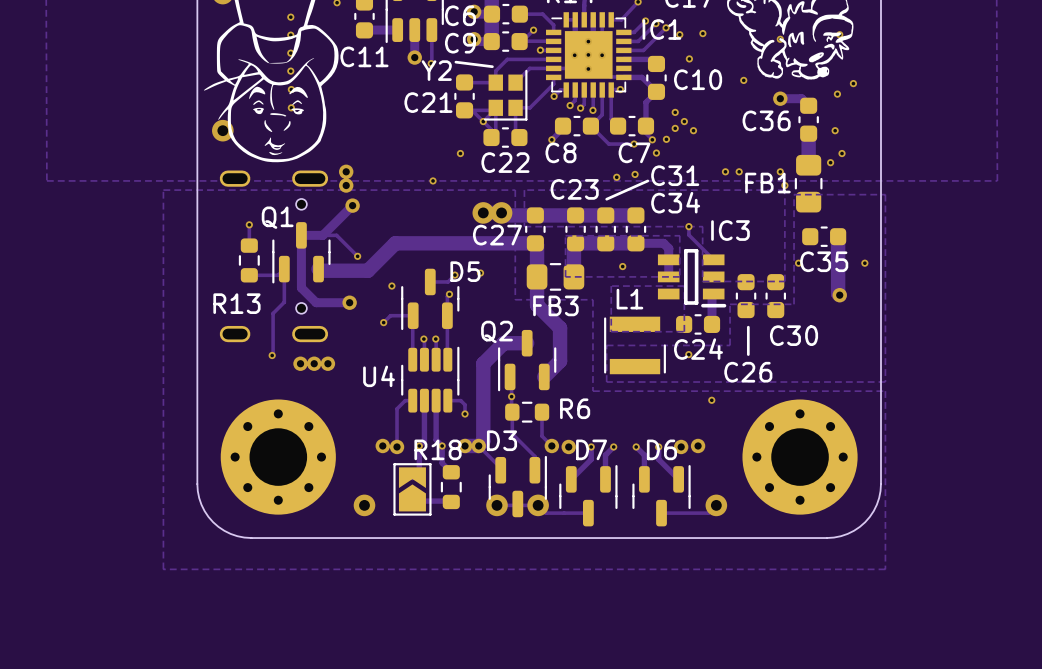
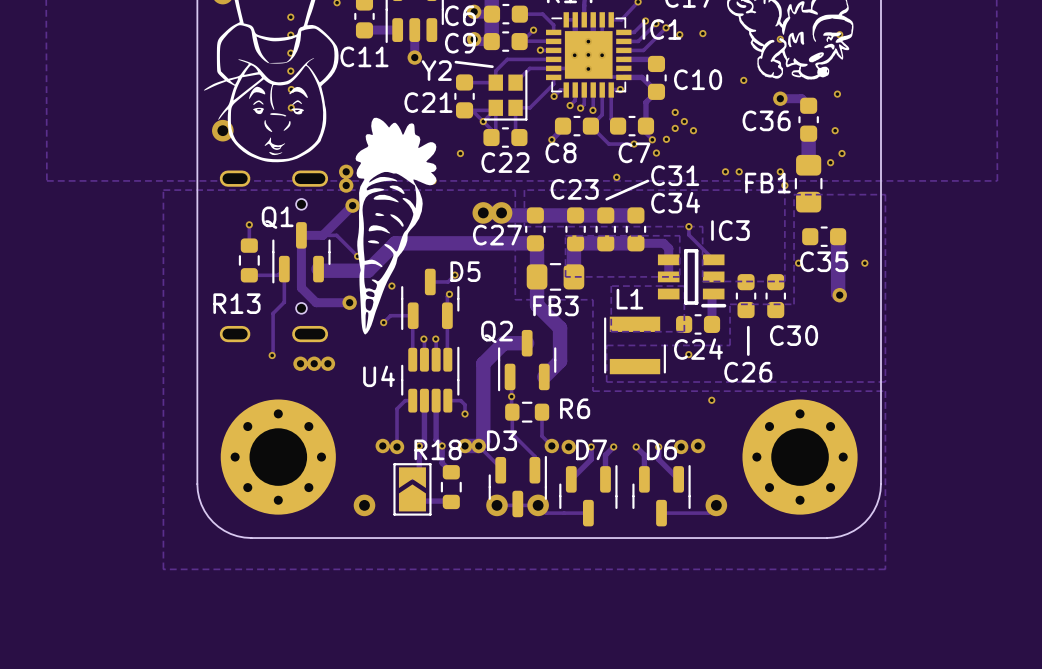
track: (431, 30) (431, 63) -> none
via: (689, 58) -> none
via: (431, 63) -> none
via: (853, 83) -> none
drawing: none -> [355, 117, 437, 335]
via: (635, 174) -> none
via: (622, 266) -> none
via: (480, 273) -> none

